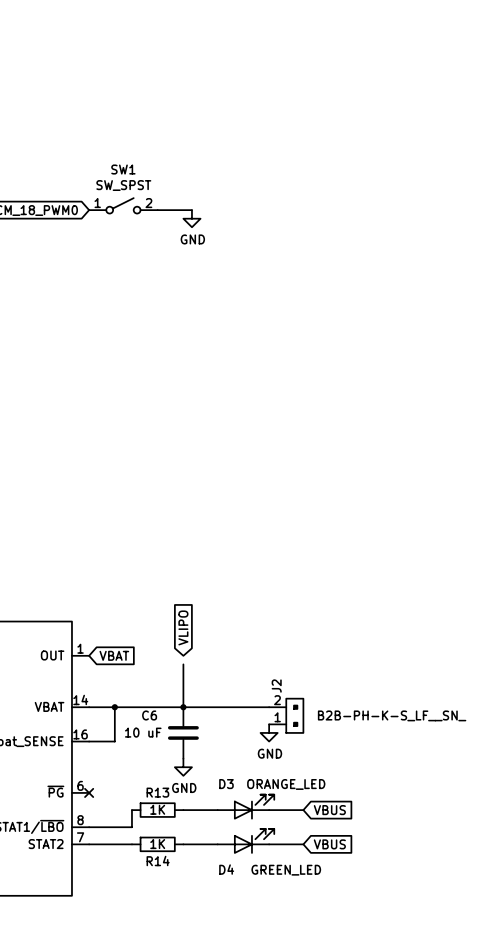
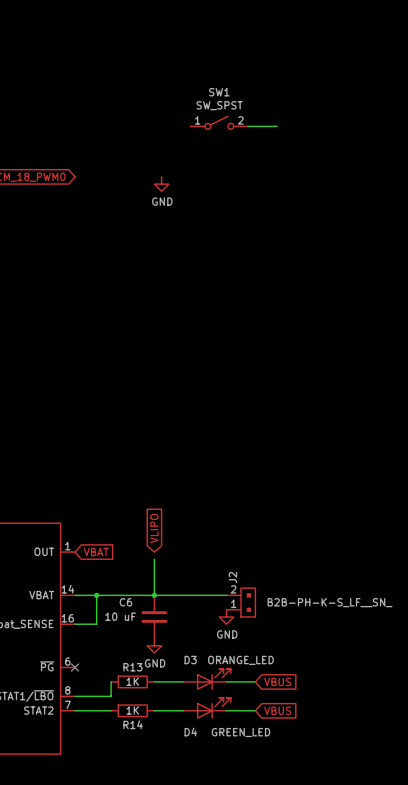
SW1 position: (123, 205) -> (219, 122)
wire: (157, 210) (191, 210) -> (248, 126) (277, 126)

